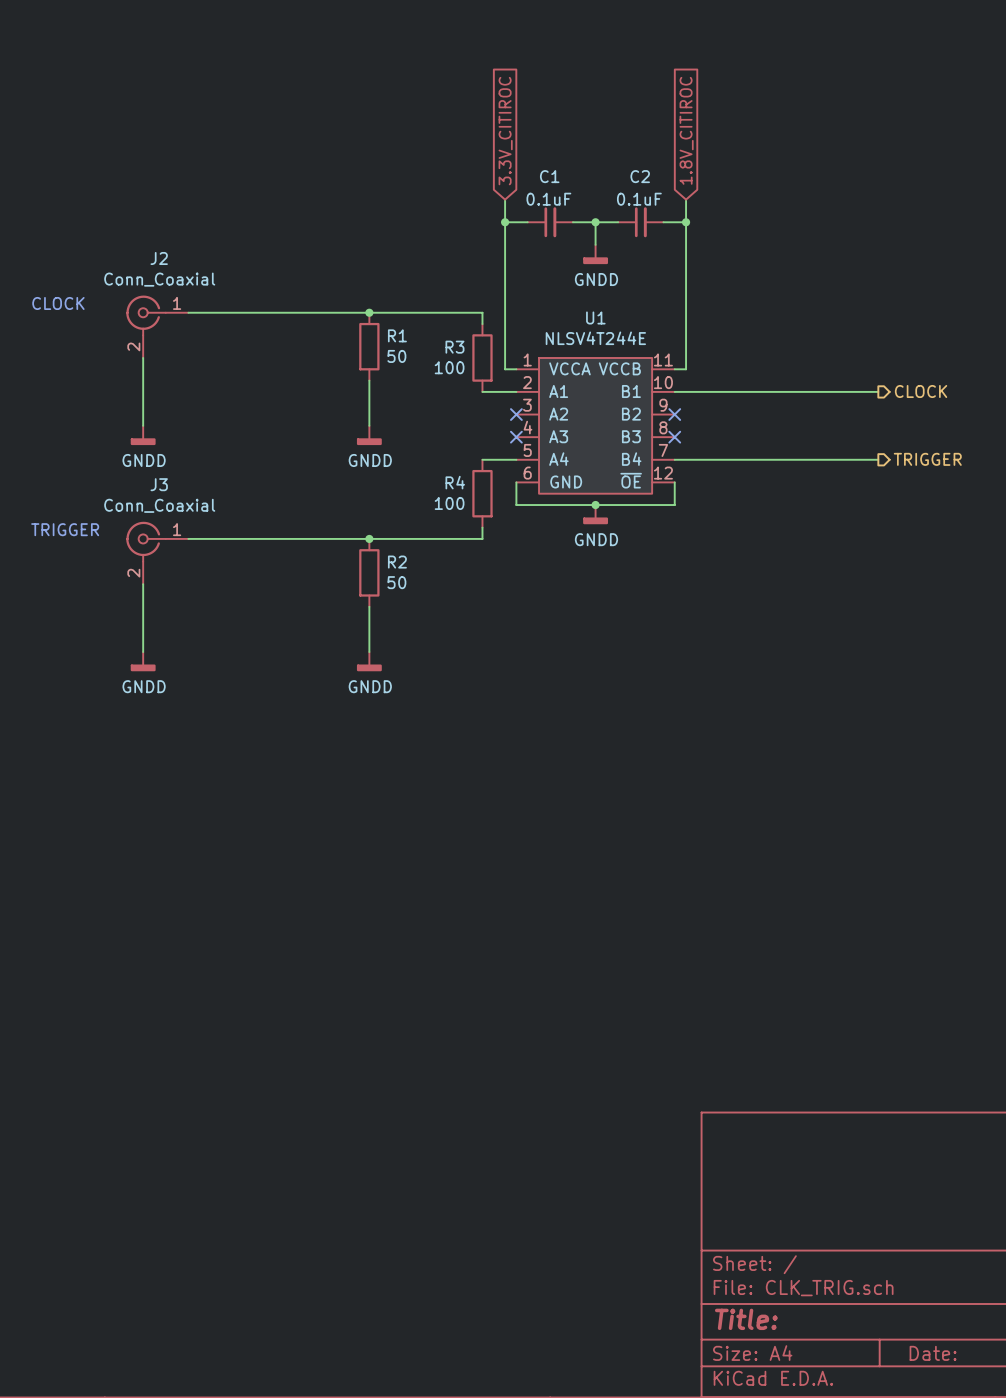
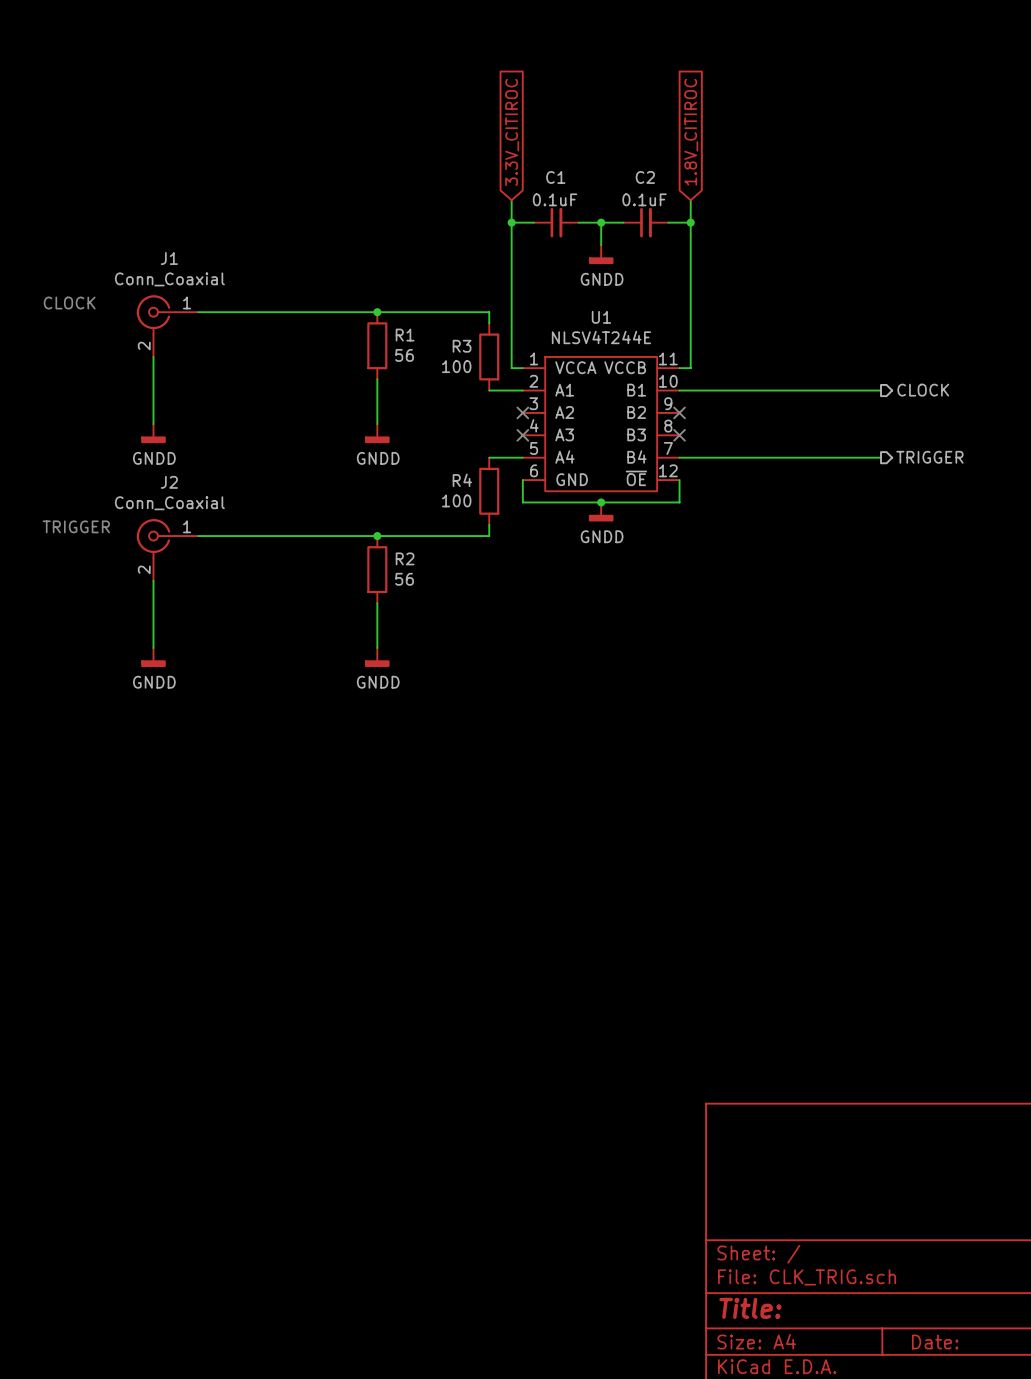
J2 name: J2 (159, 258) -> J1 (169, 258)
R1 value: 50 (396, 356) -> 56 (404, 355)
J3 name: J3 (159, 484) -> J2 (169, 482)
R2 value: 50 (396, 582) -> 56 (404, 579)

